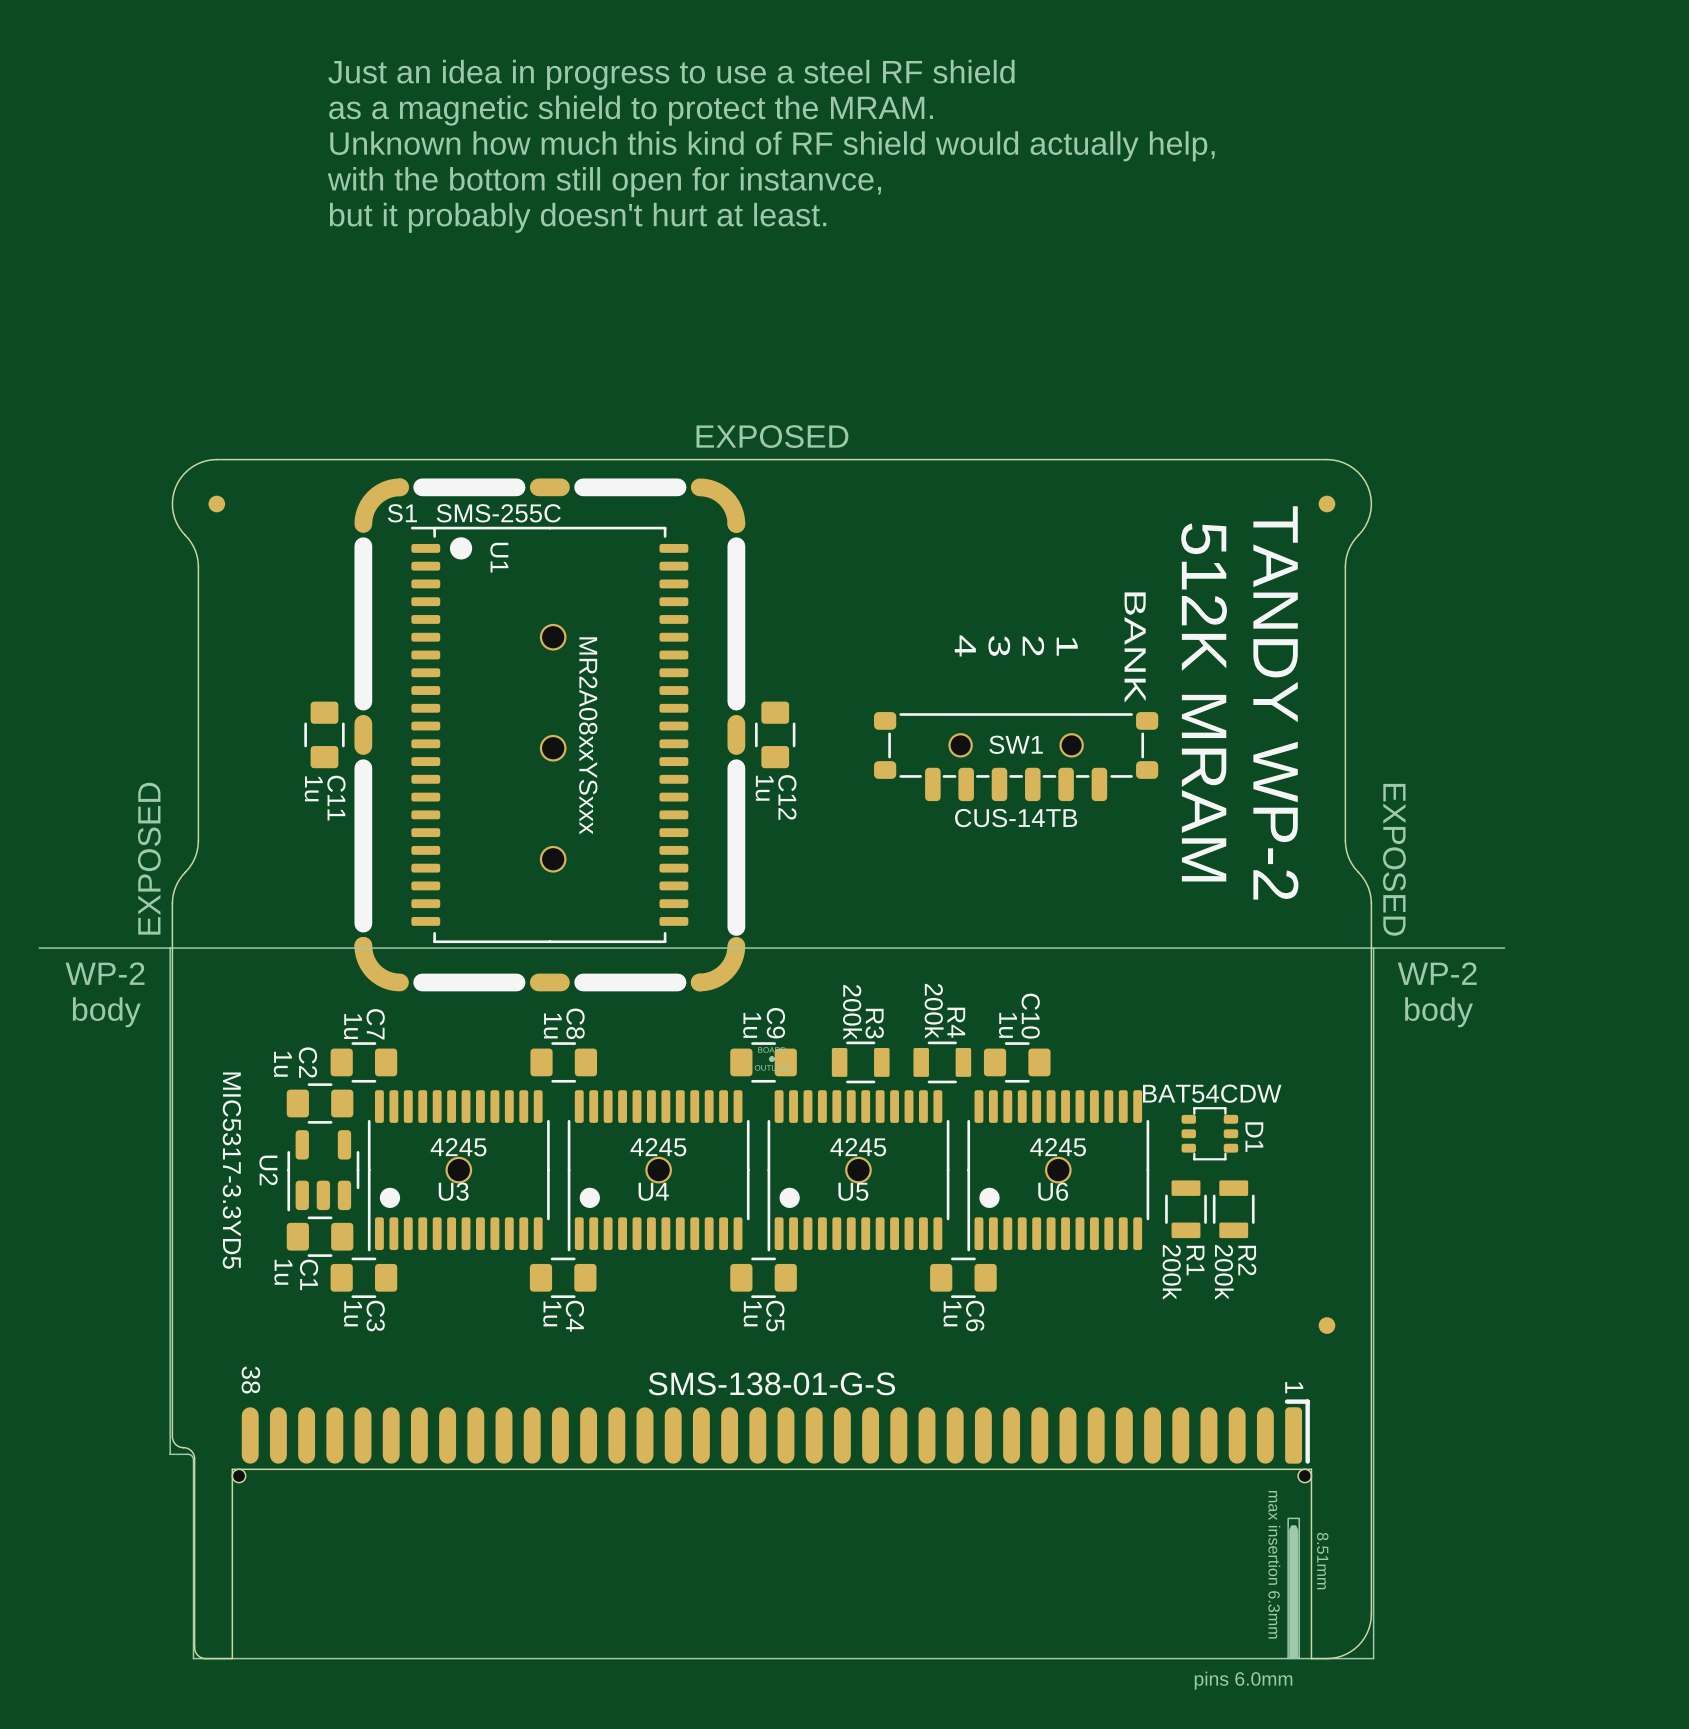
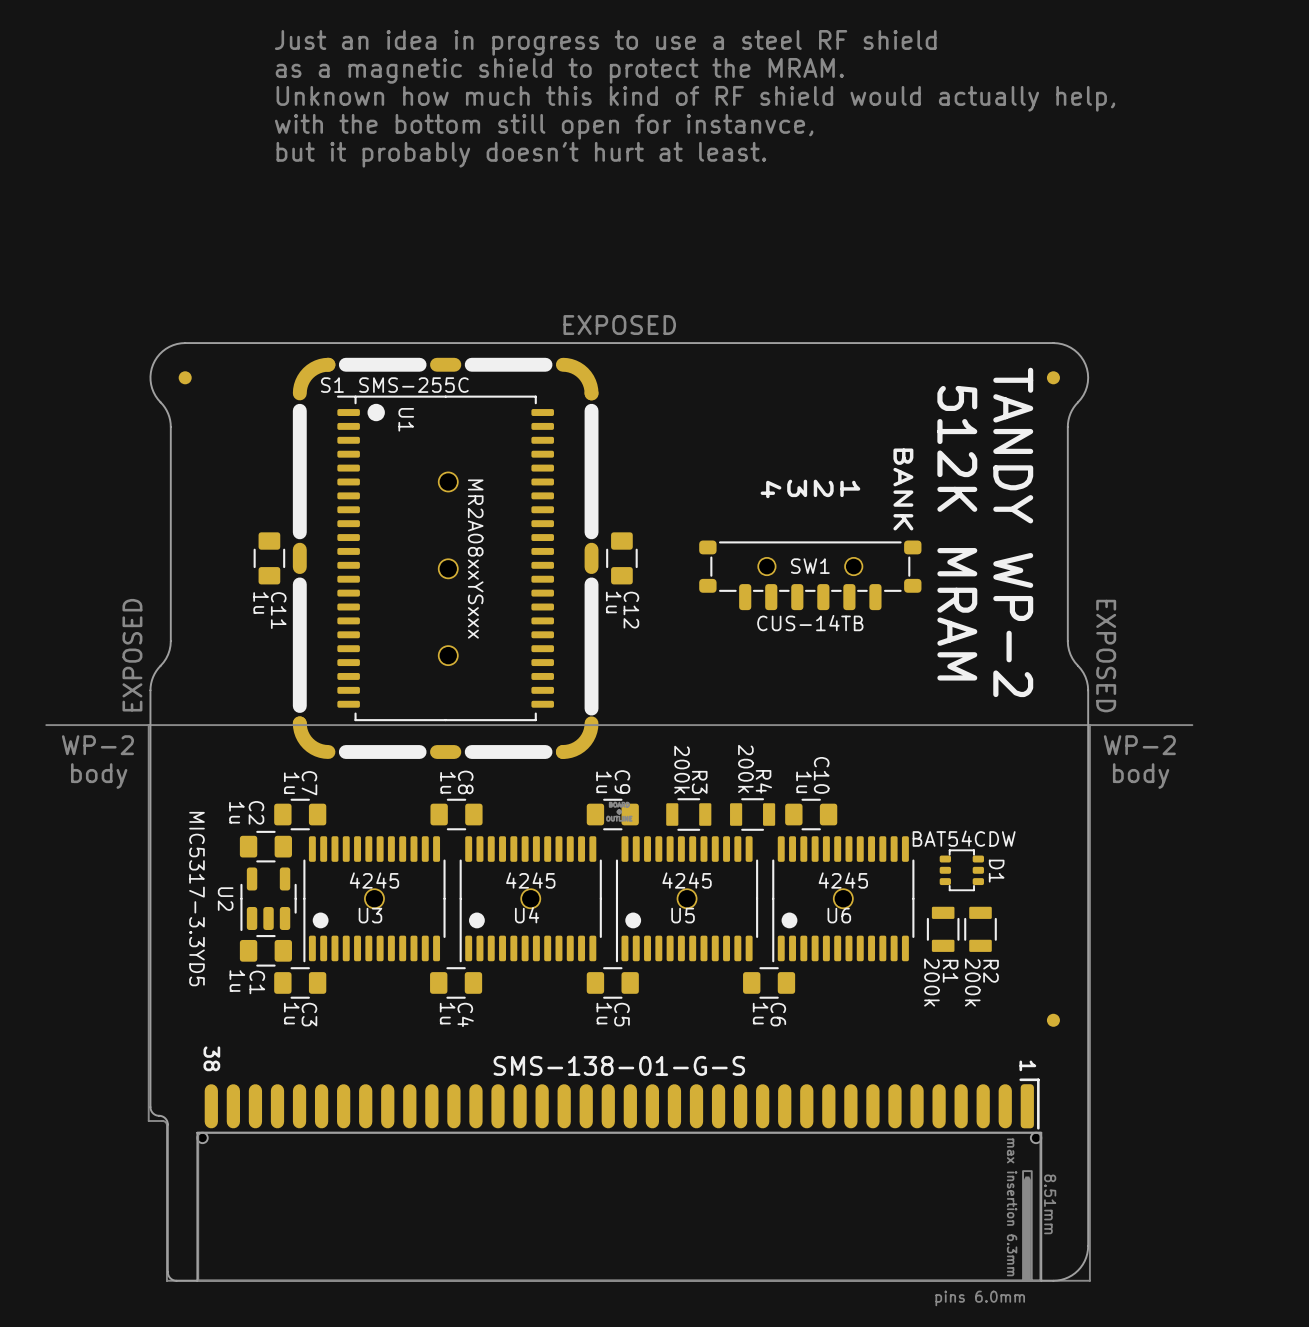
part footprint: [241, 1399, 1310, 1659] -> [197, 1078, 1041, 1281]

